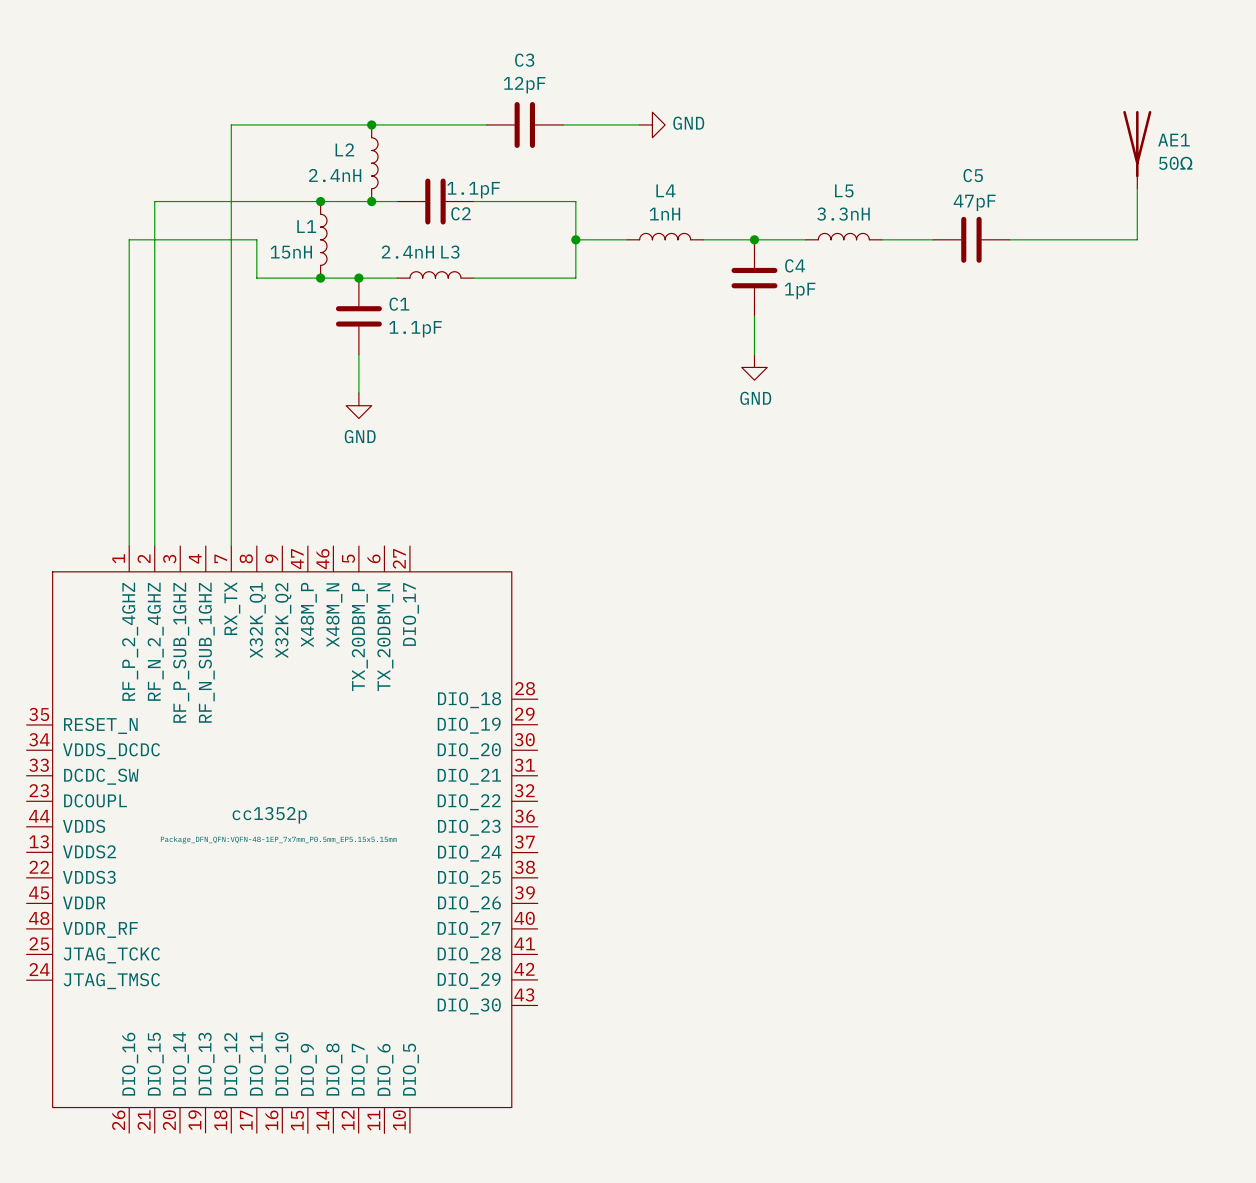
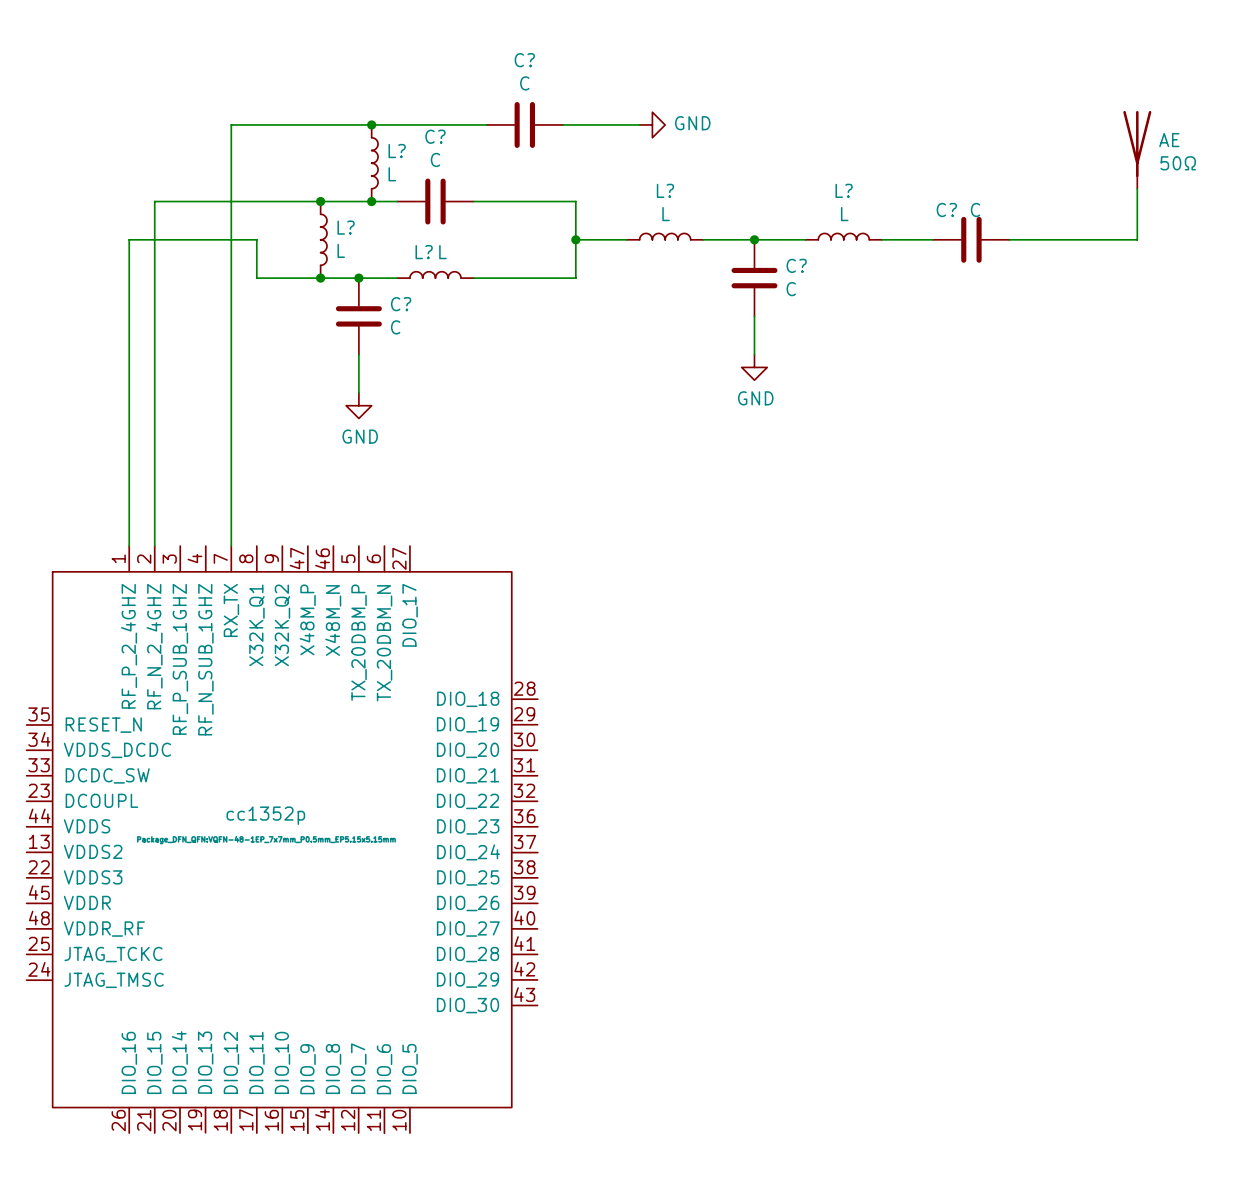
C3 name: C3 (524, 60) -> C? (524, 60)
C3 value: 12pF (524, 85) -> C (524, 83)
AE1 name: AE1 (1174, 140) -> AE (1169, 140)
L2 name: L2 (344, 149) -> L? (397, 151)
L2 value: 2.4nH (335, 175) -> L (392, 174)
C5 name: C5 (973, 175) -> C? (946, 209)
C2 value: 1.1pF (473, 190) -> C (435, 159)
L4 name: L4 (665, 190) -> L? (665, 190)
L5 name: L5 (844, 190) -> L? (844, 190)
C5 value: 47pF (974, 202) -> C (975, 209)
C2 name: C2 (461, 213) -> C? (435, 136)
L4 value: 1nH (664, 214) -> L (666, 214)
L5 value: 3.3nH (843, 214) -> L (844, 214)
L1 name: L1 (306, 226) -> L? (346, 227)
L1 value: 15nH (291, 252) -> L (341, 250)
L3 value: 2.4nH (407, 252) -> L (442, 252)
L3 name: L3 (450, 252) -> L? (424, 252)
C4 name: C4 (795, 265) -> C? (796, 265)
C4 value: 1pF (800, 290) -> C (791, 289)
C1 name: C1 (399, 304) -> C? (401, 304)
C1 value: 1.1pF (415, 329) -> C (395, 327)

